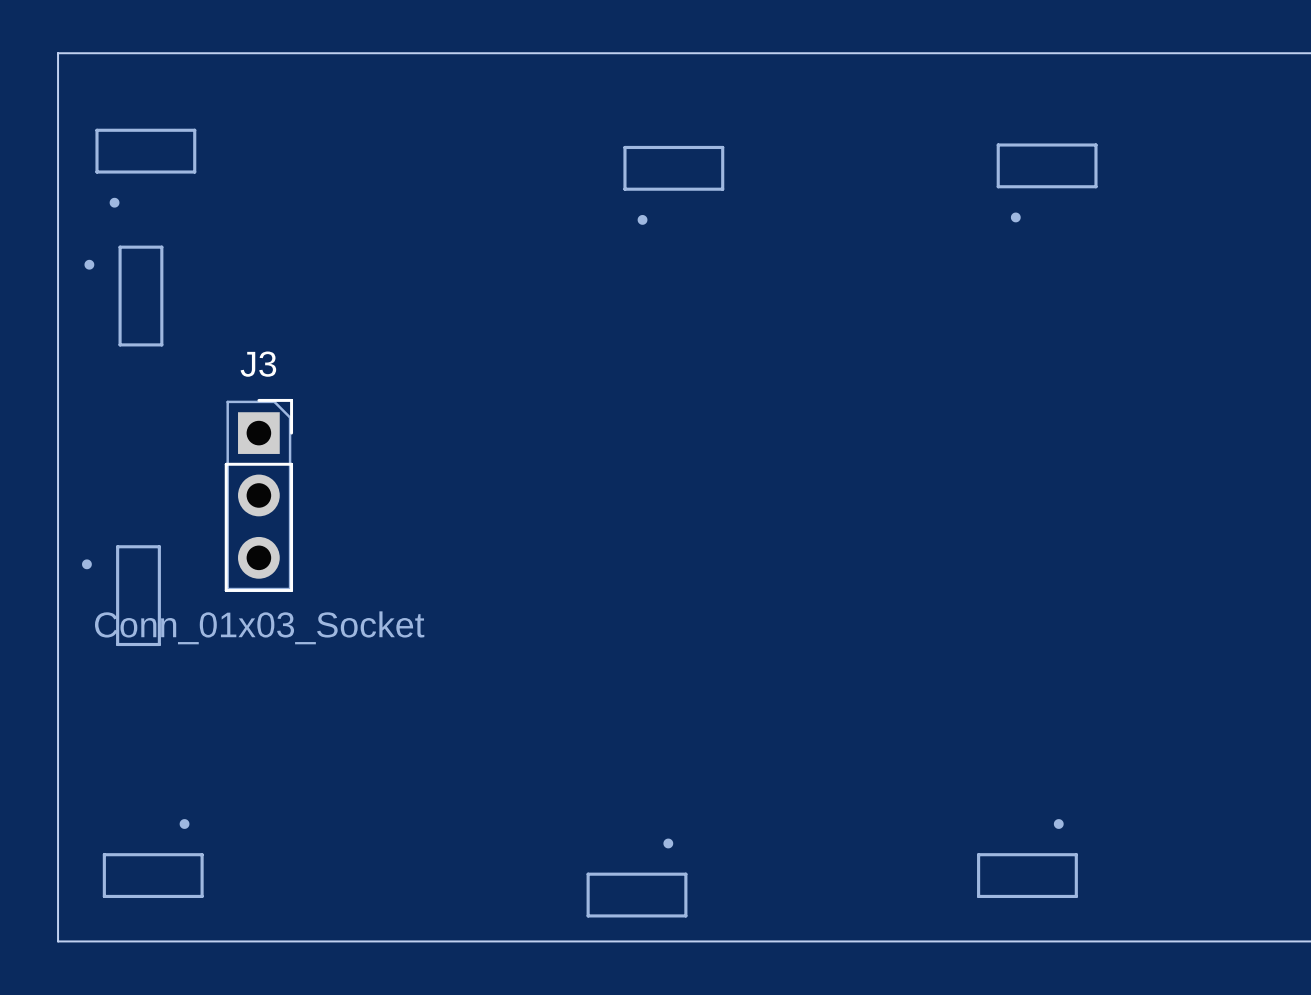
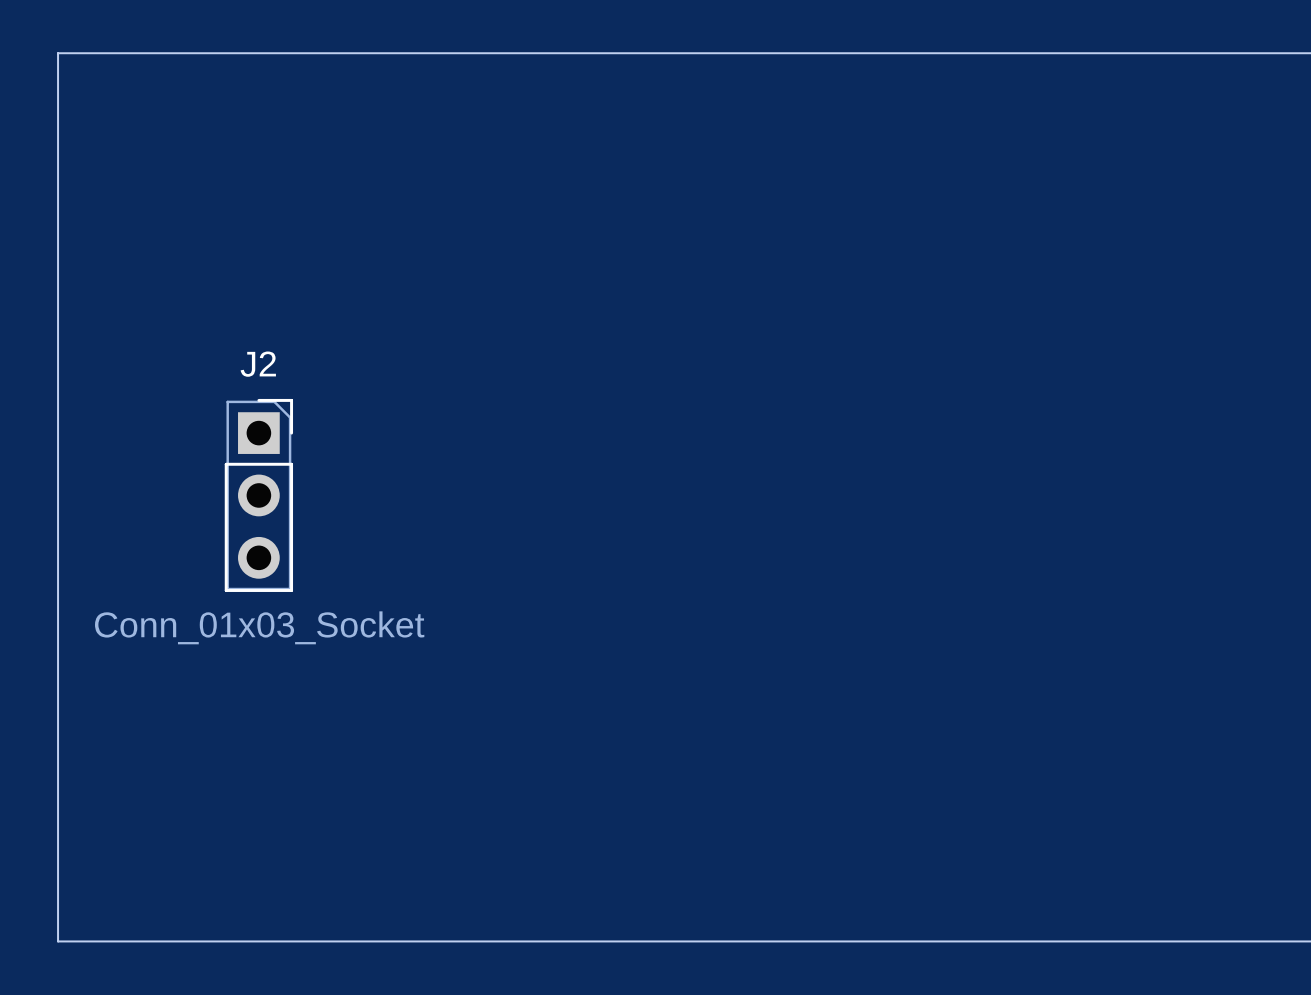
part: (145, 168) -> none
part: (1047, 182) -> none
part: (673, 185) -> none
part: (123, 296) -> none
J3 name: J3 (258, 364) -> J2 (258, 364)
part: (121, 595) -> none
part: (153, 858) -> none
part: (1027, 858) -> none
part: (637, 878) -> none

